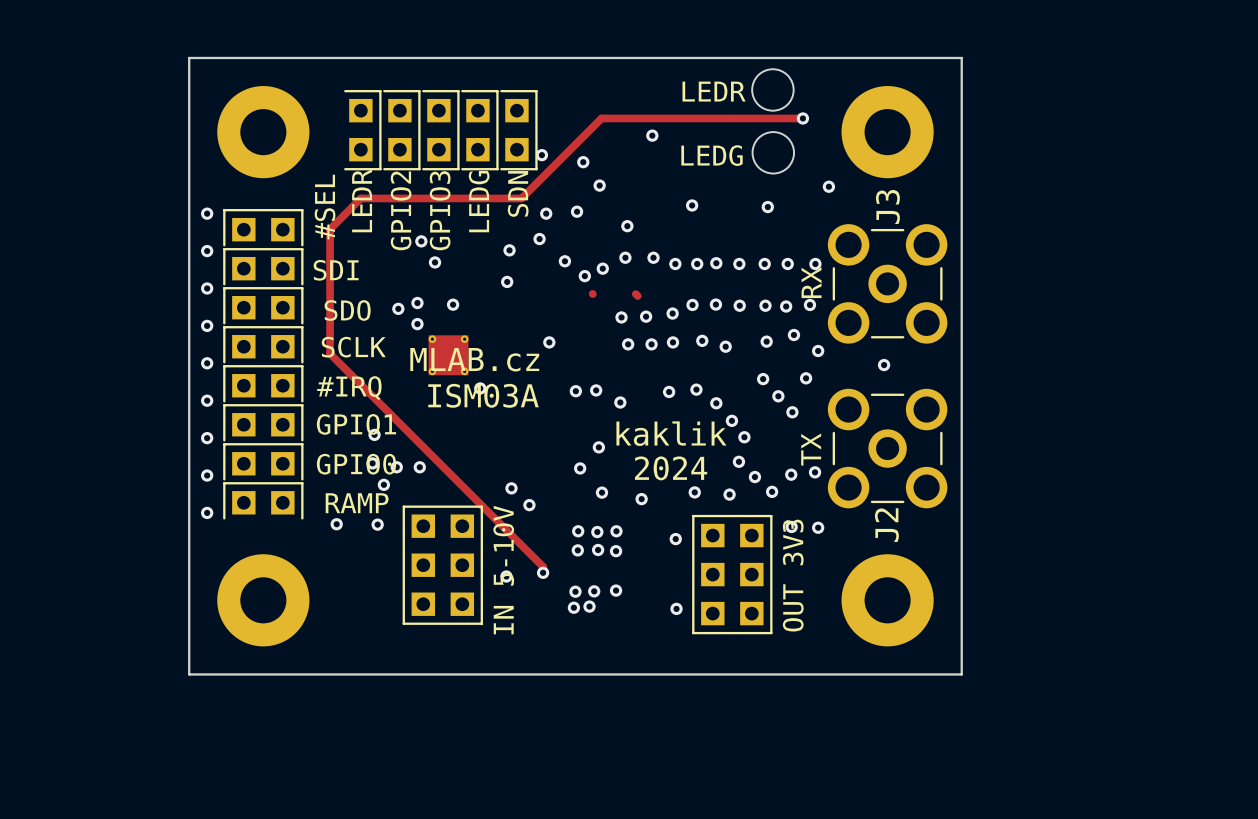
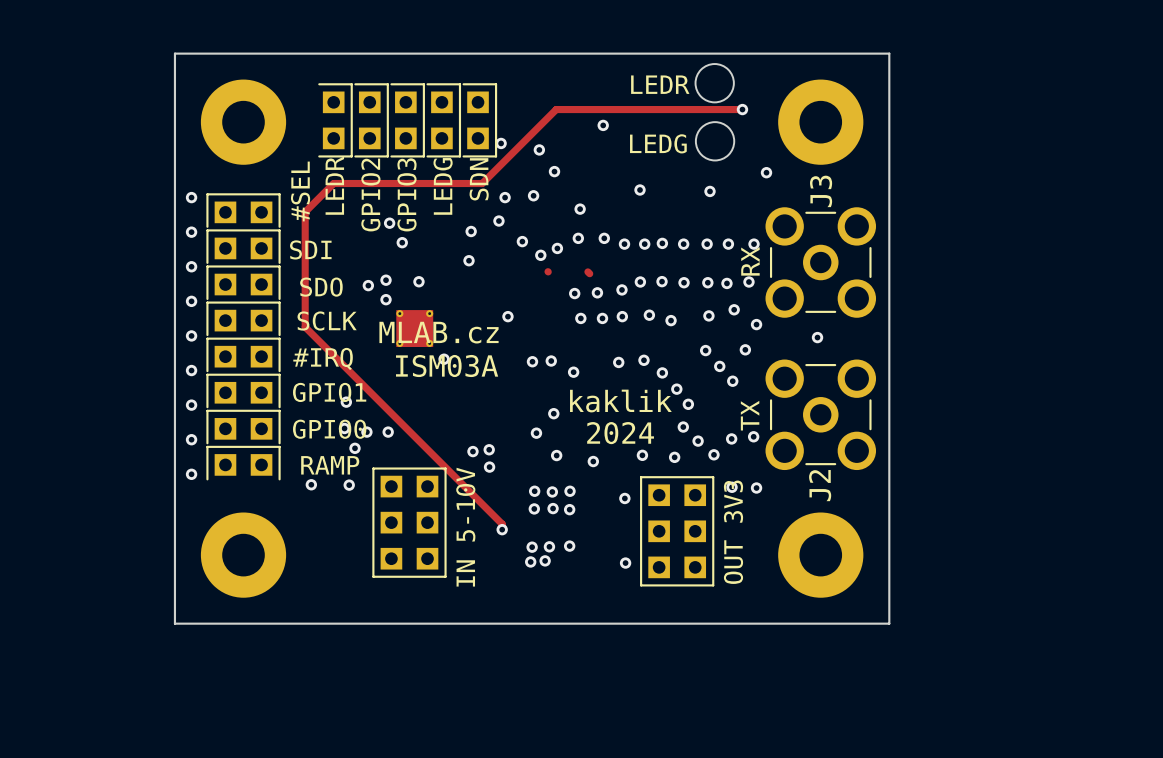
via: none -> (489, 449)
via: (506, 576) -> none

